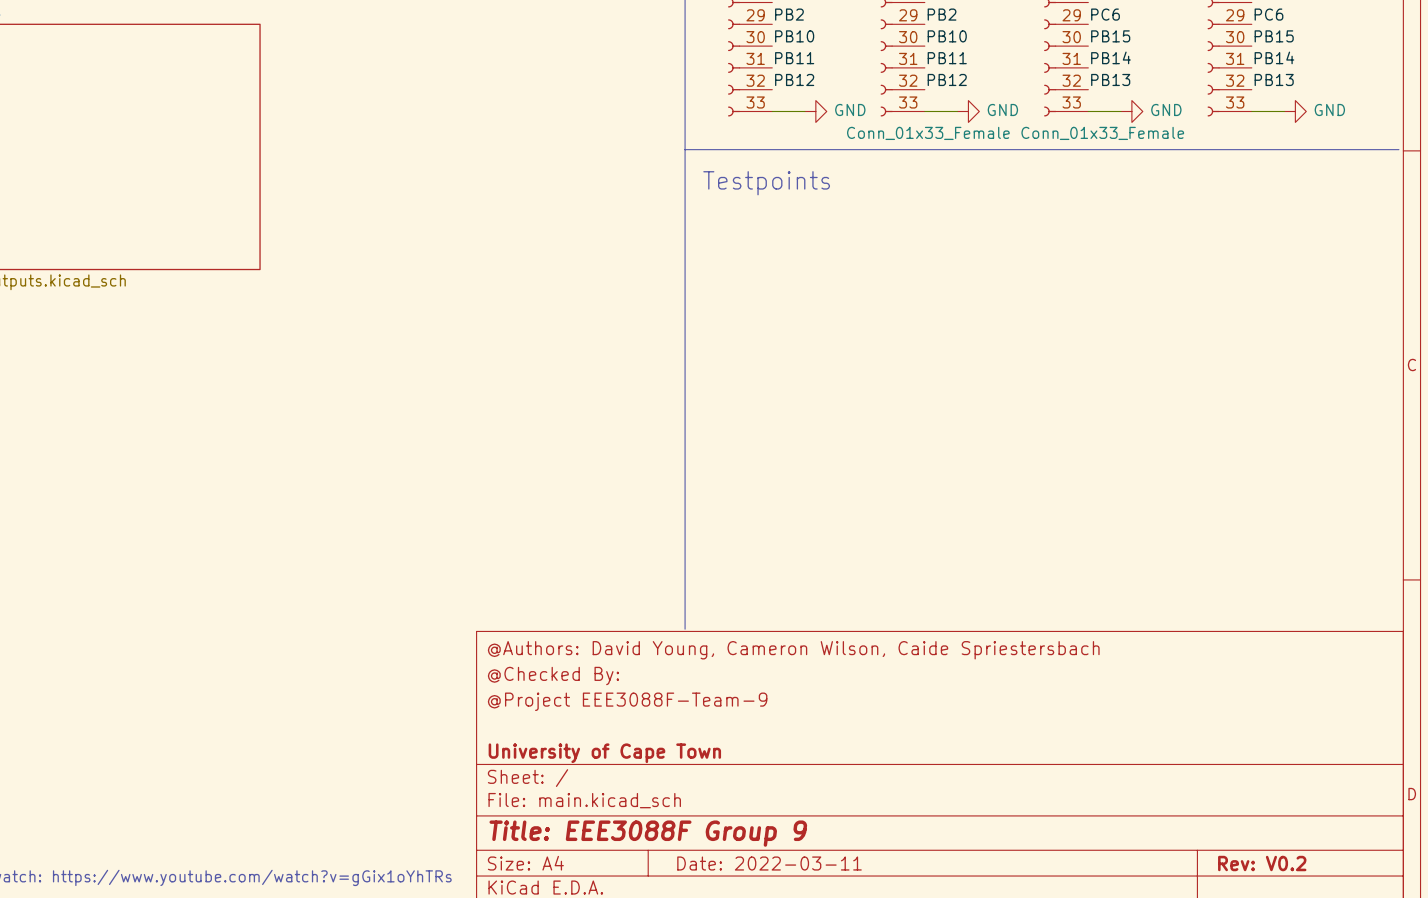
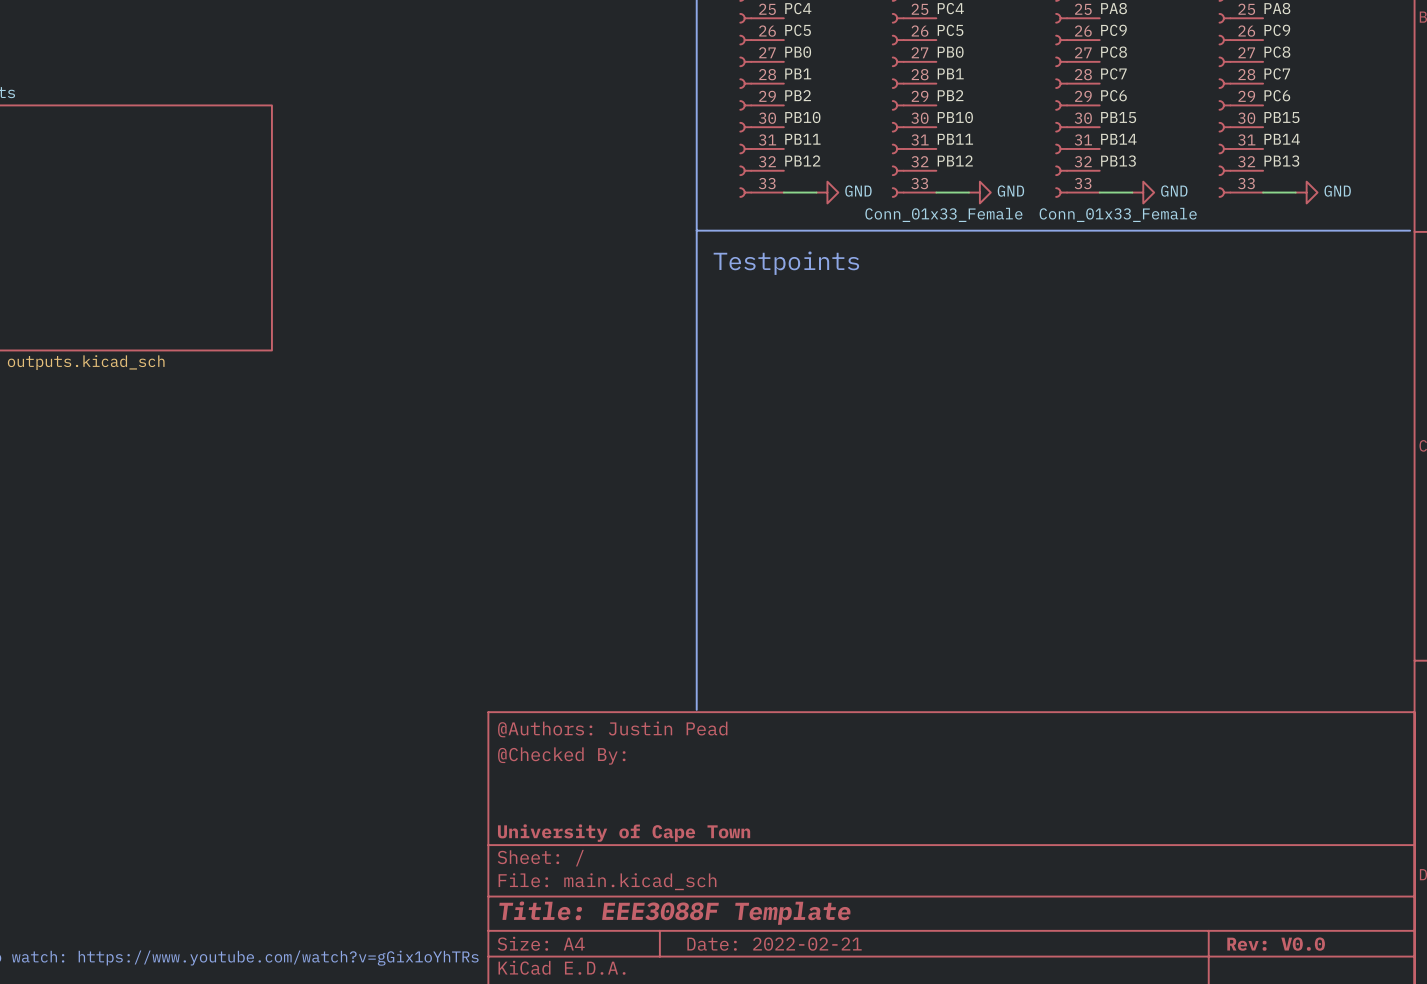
title block: @Authors: David Young, Cameron Wilson, Caide Spriestersbach (793, 650) -> @Authors: Justin Pead (612, 729)
title block: @Project EEE3088F-Team-9 (627, 701) -> none
title block: Title: EEE3088F Group 9 (648, 833) -> Title: EEE3088F Template (674, 913)
title block: Date: 2022-03-11 (769, 863) -> Date: 2022-02-21 (774, 944)
title block: Rev: V0.2 (1262, 863) -> Rev: V0.0 (1276, 944)

